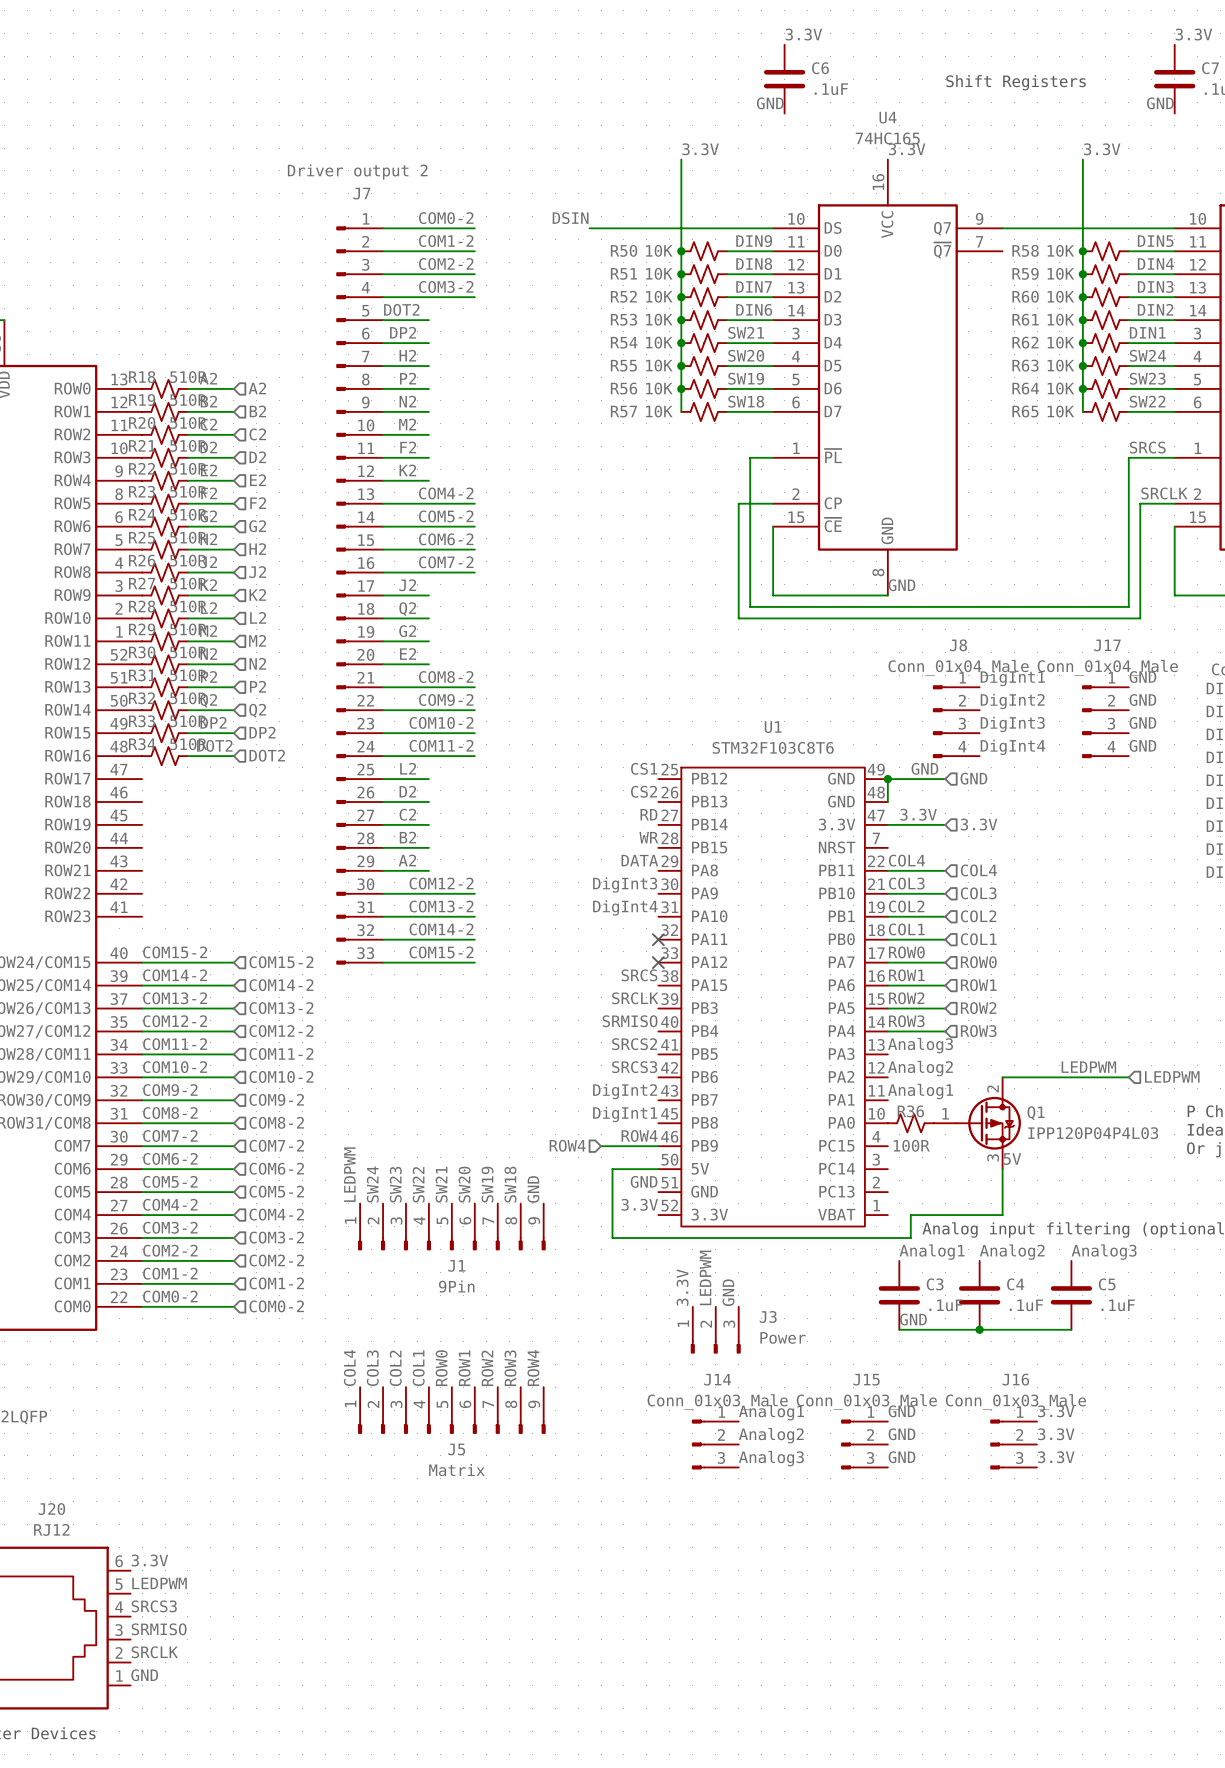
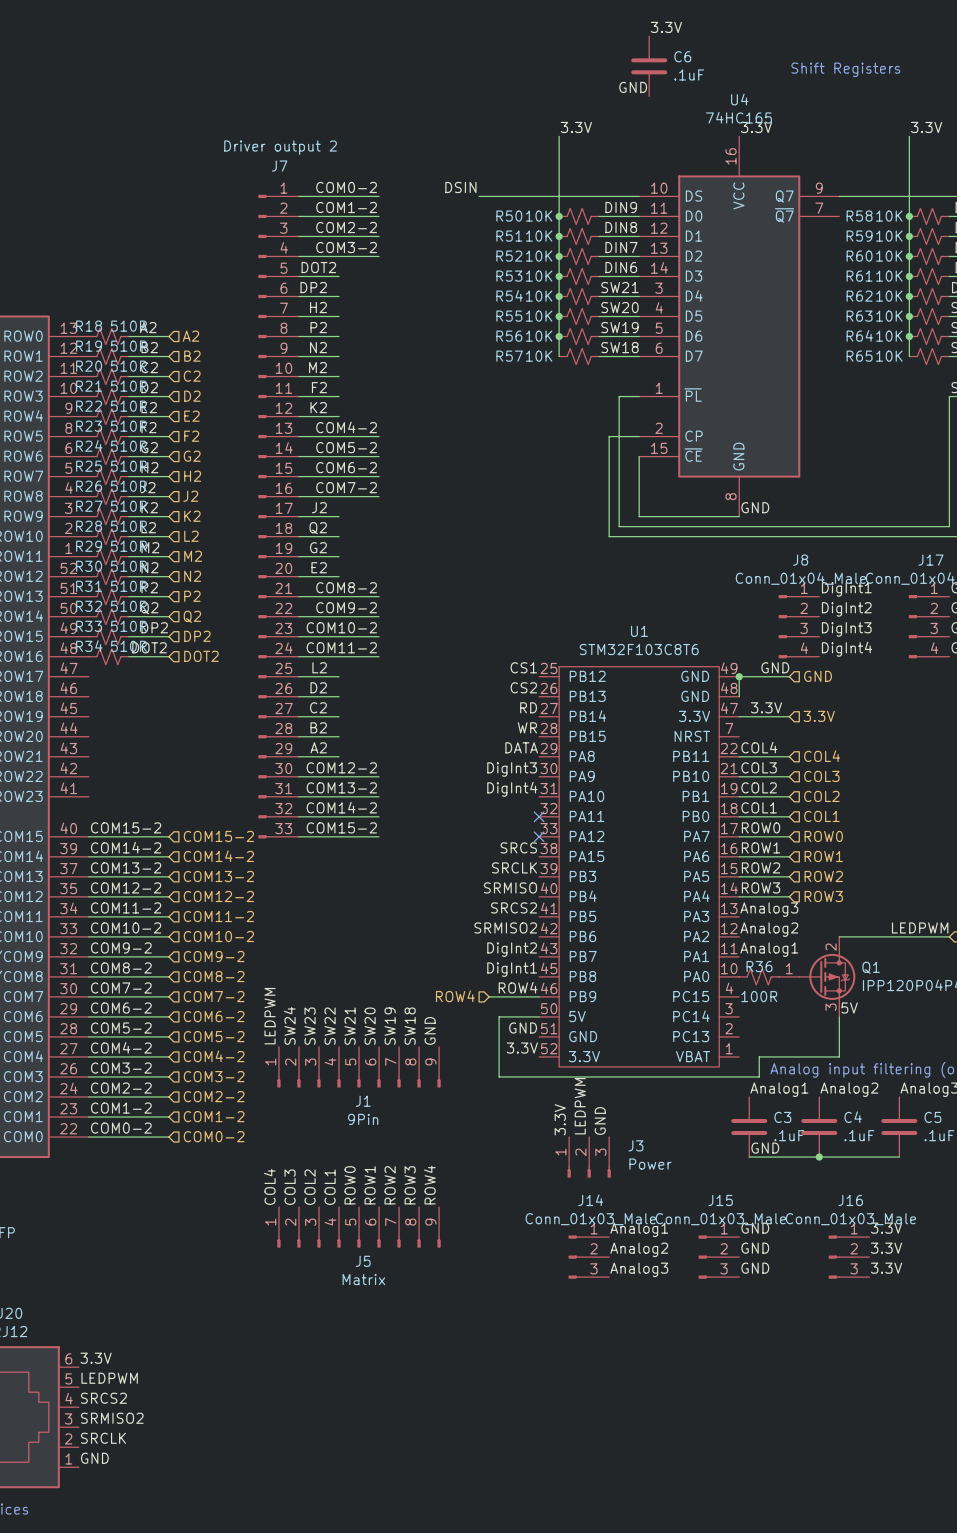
label: SRCS3 (634, 1067) -> SRMISO2 (505, 927)
label: SRCS3 (154, 1606) -> SRCS2 (103, 1398)
label: SRMISO (159, 1629) -> SRMISO2 (112, 1418)

